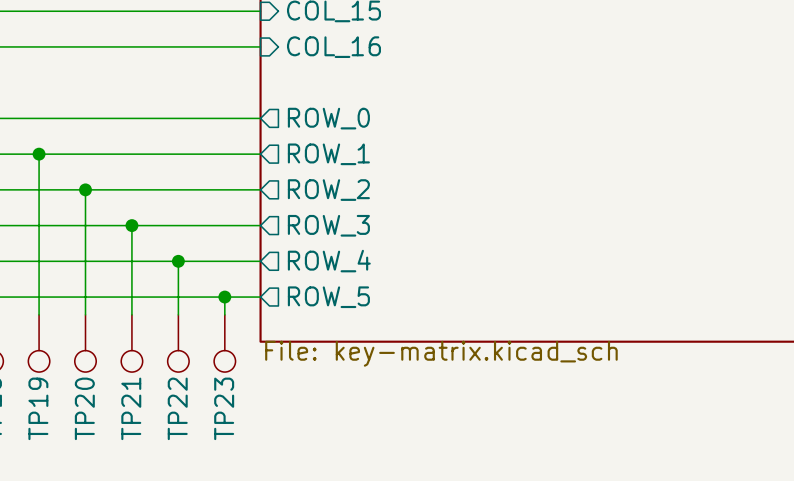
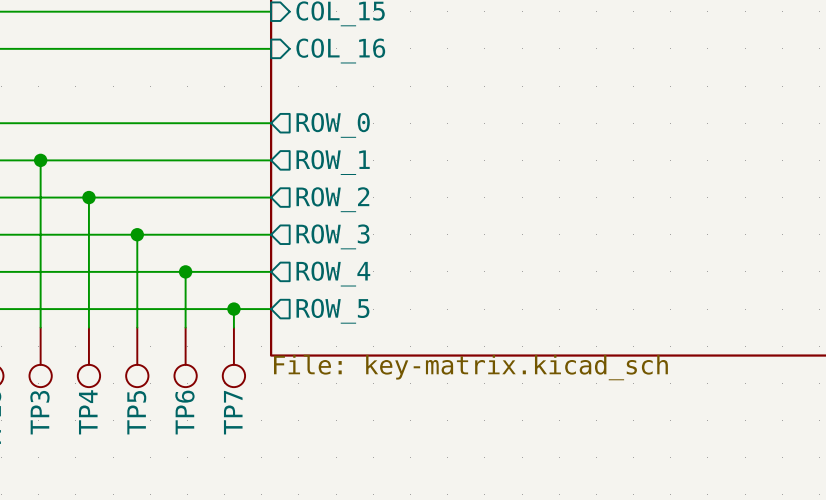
TP19 name: TP19 (38, 408) -> TP3 (39, 412)
TP20 name: TP20 (84, 408) -> TP4 (88, 412)
TP21 name: TP21 (131, 408) -> TP5 (136, 412)
TP22 name: TP22 (177, 408) -> TP6 (184, 412)
TP23 name: TP23 (224, 408) -> TP7 (233, 412)

